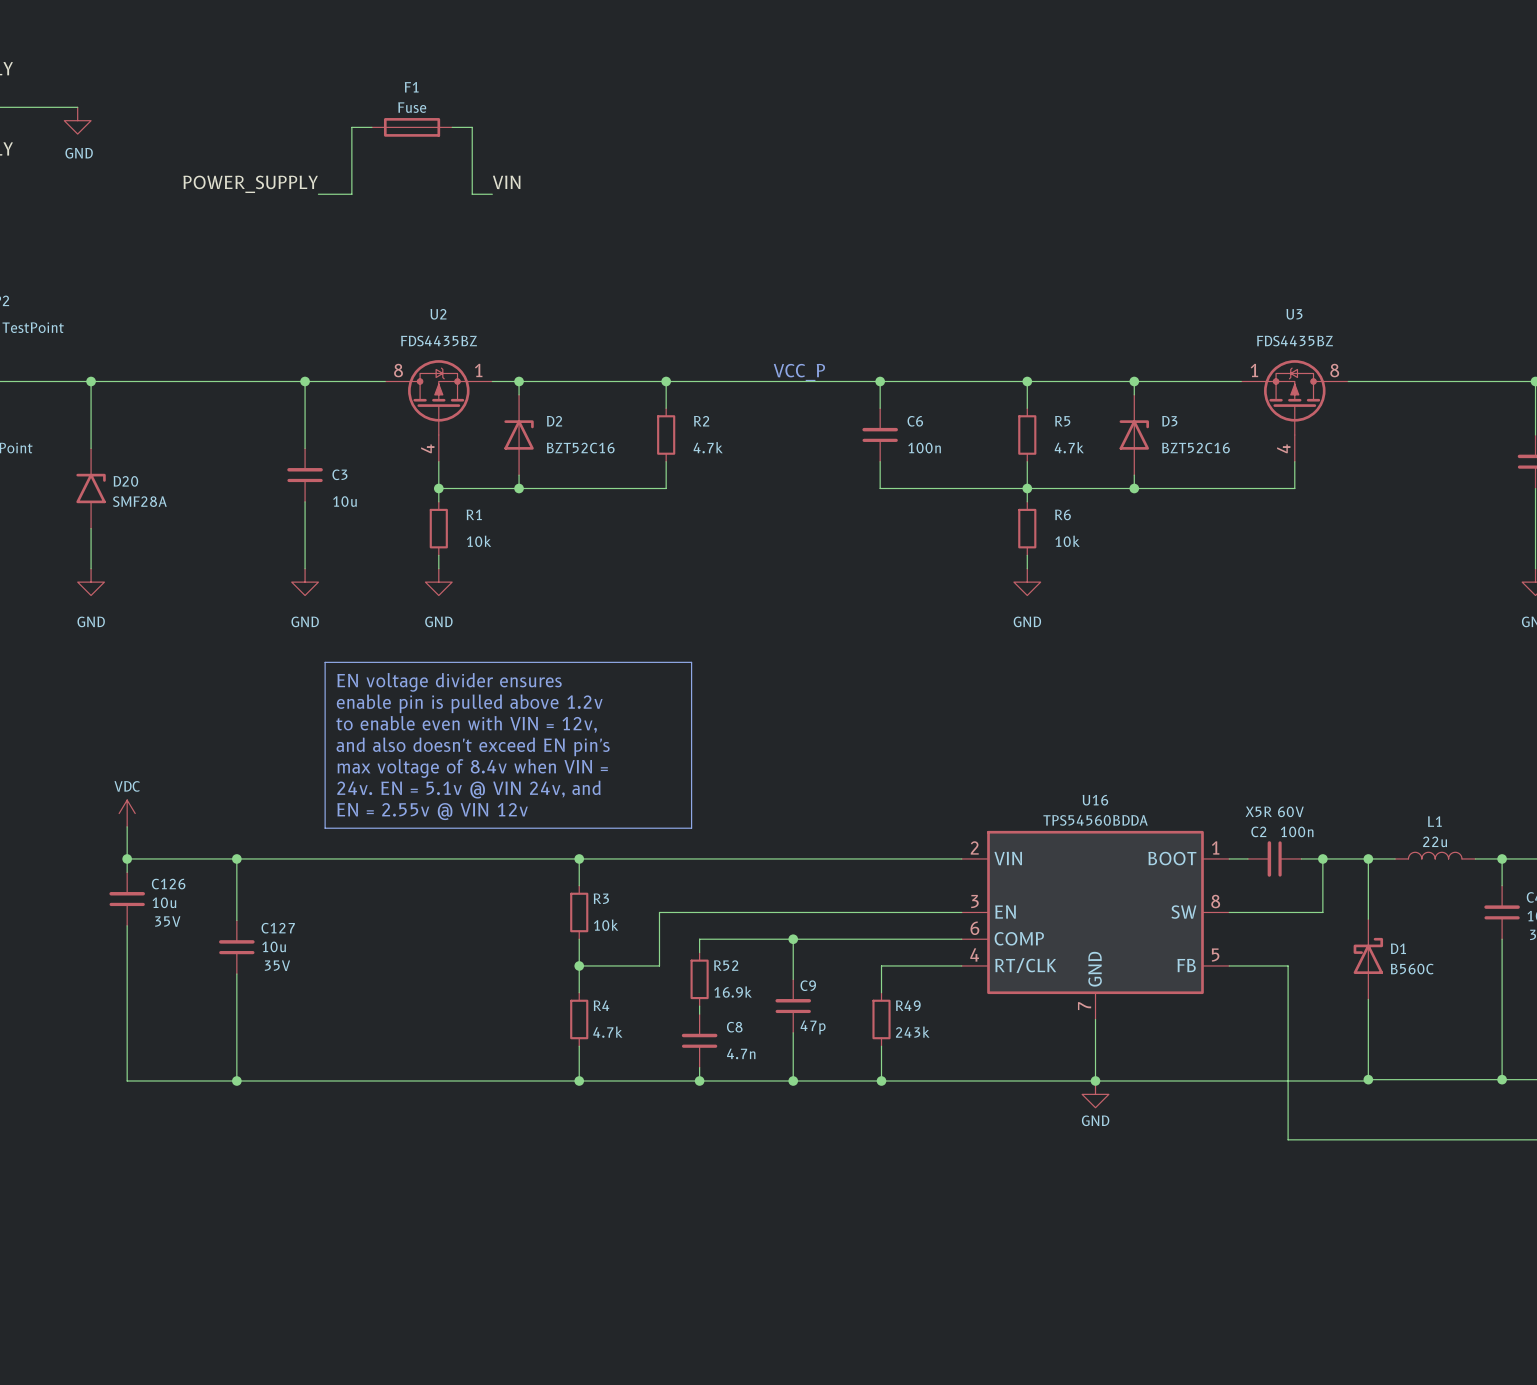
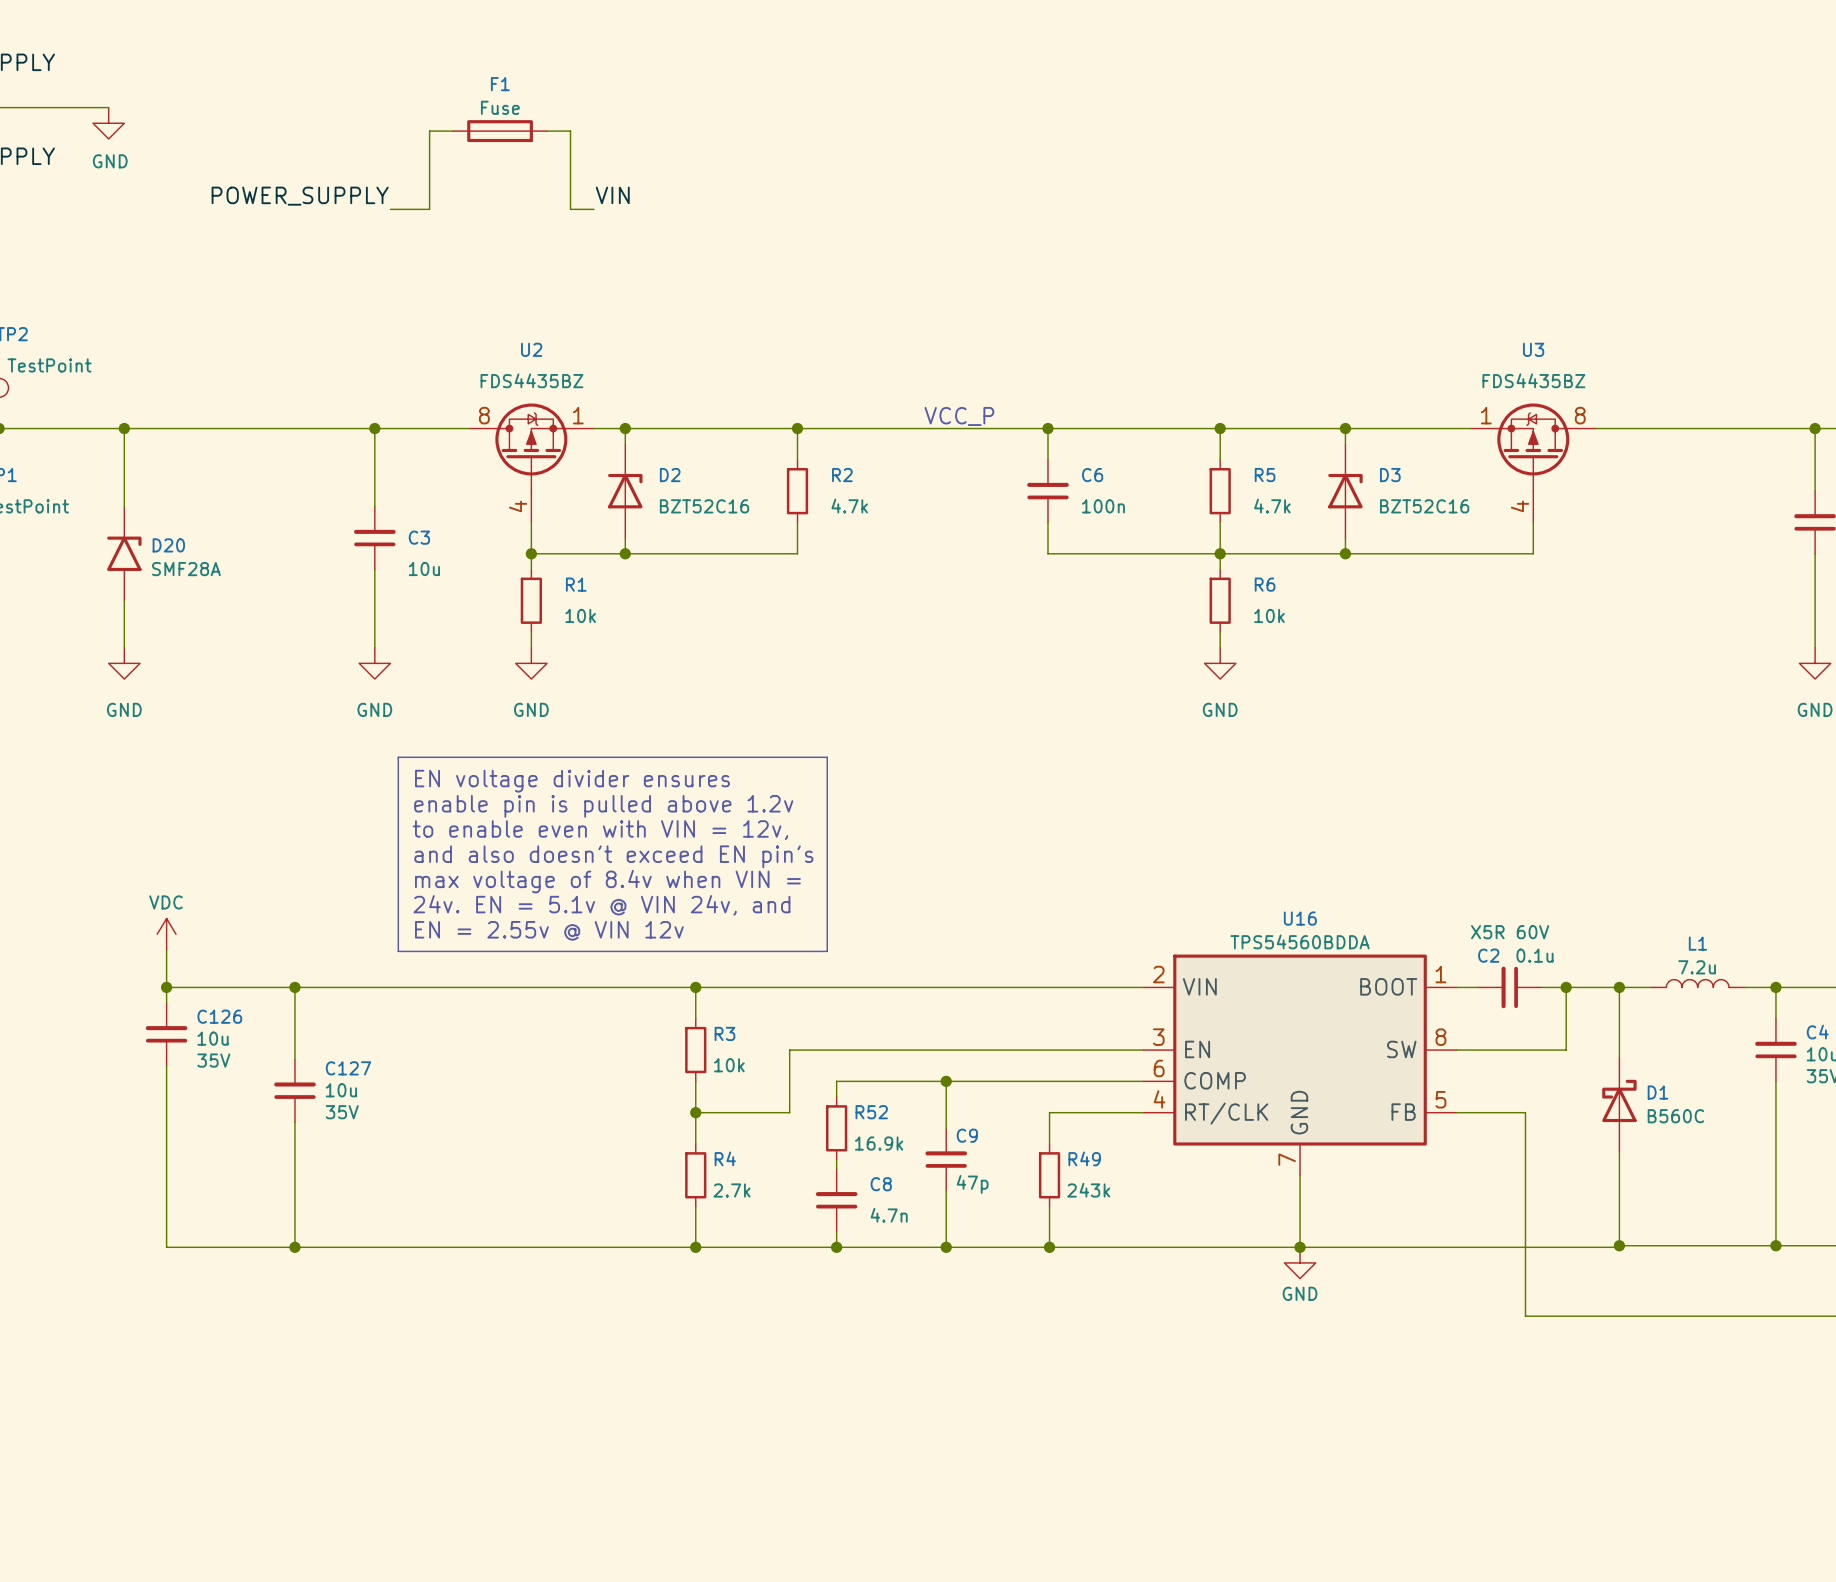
C2 value: 100n (1297, 831) -> 0.1u (1535, 955)
L1 value: 22u (1435, 841) -> 7.2u (1697, 967)
R4 value: 4.7k (607, 1032) -> 2.7k (732, 1190)

